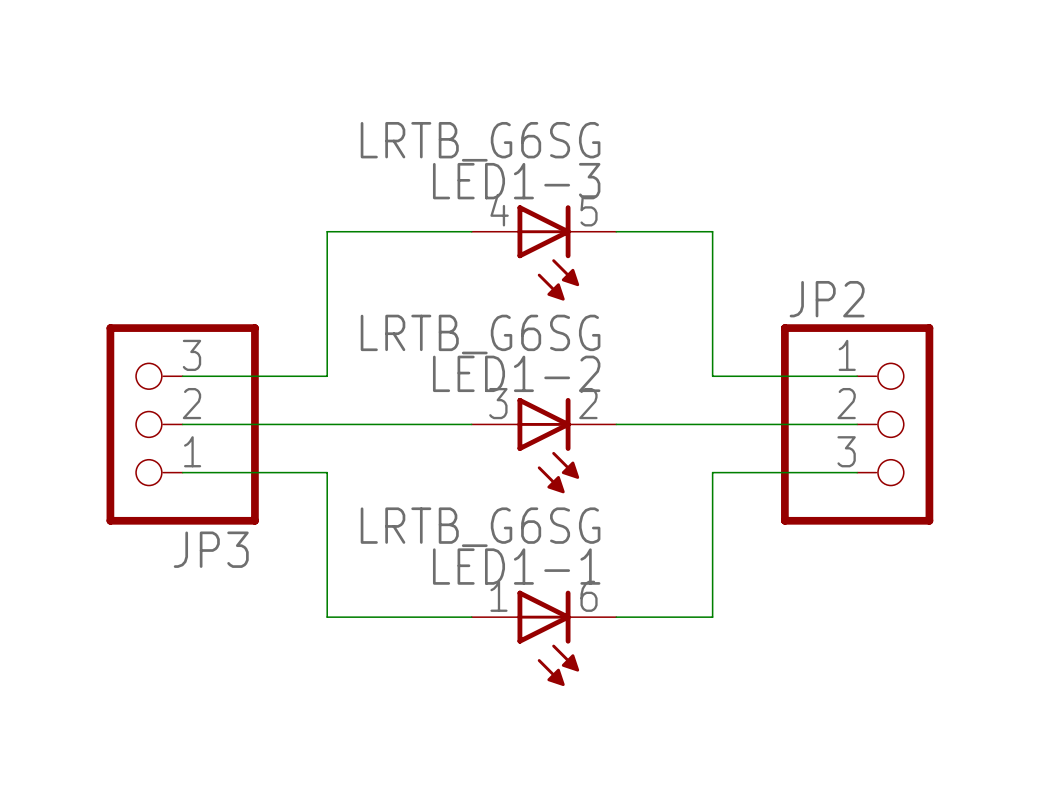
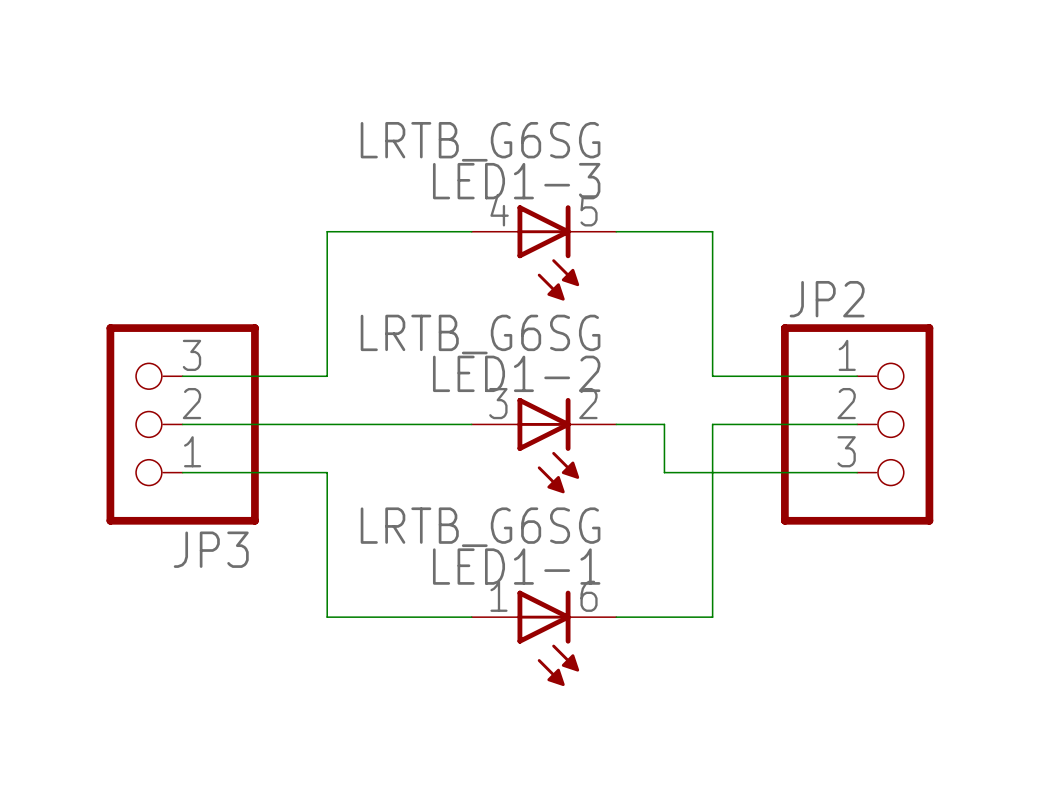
wire: (664, 424) (712, 424) -> (664, 424) (664, 472) (712, 472) (712, 424)

